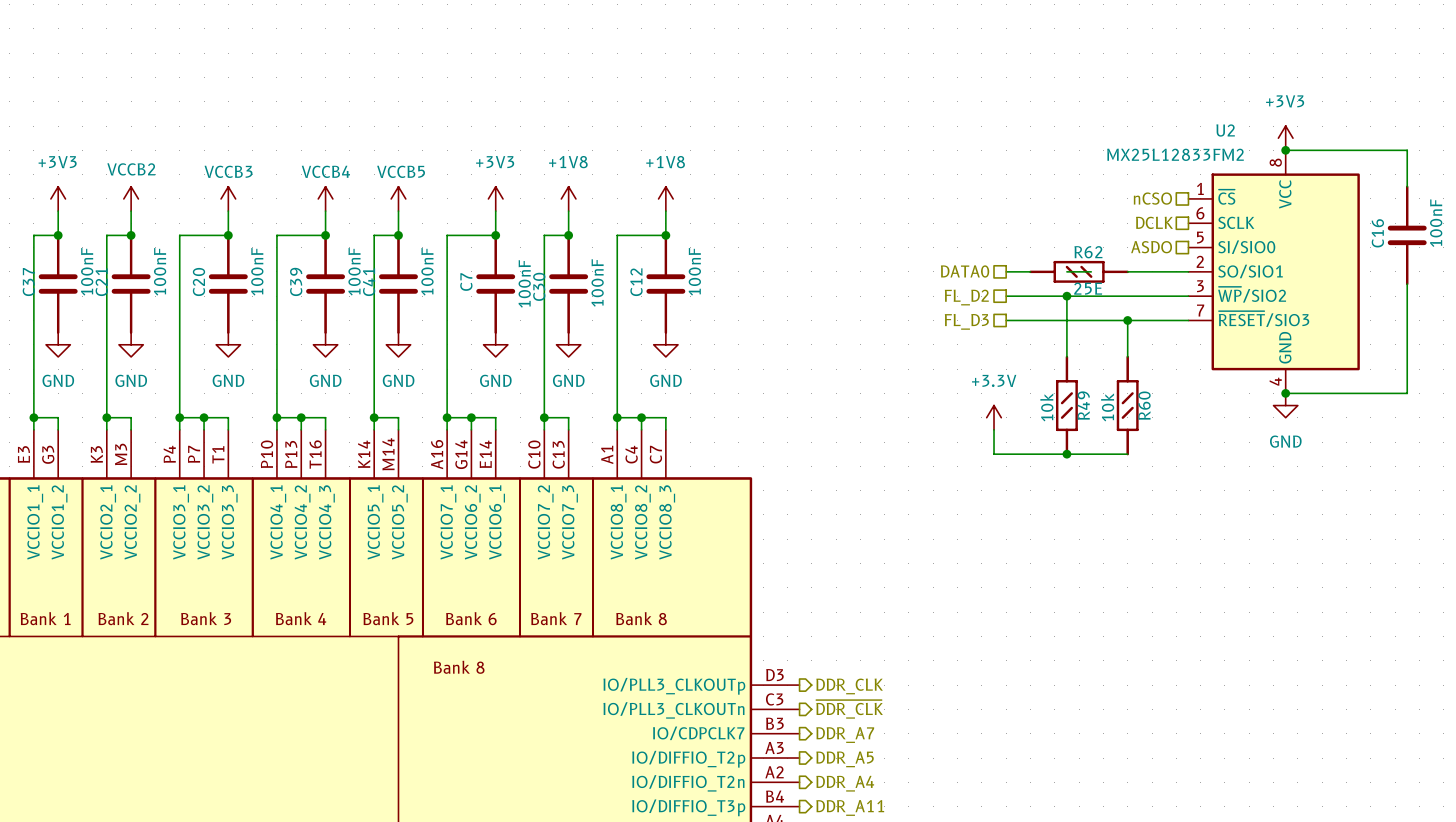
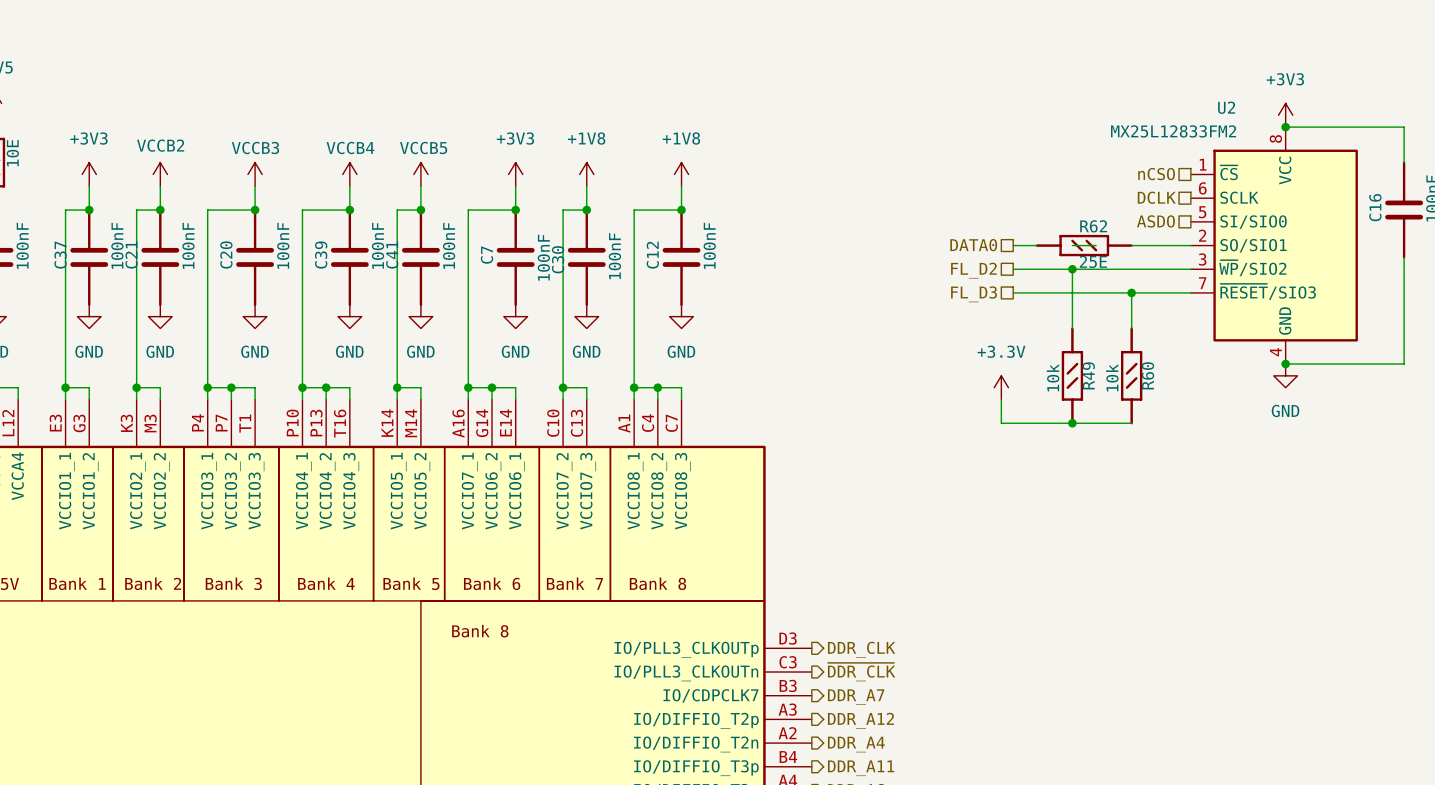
hierarchical label: DDR_A5 (845, 759) -> DDR_A12 (860, 720)

